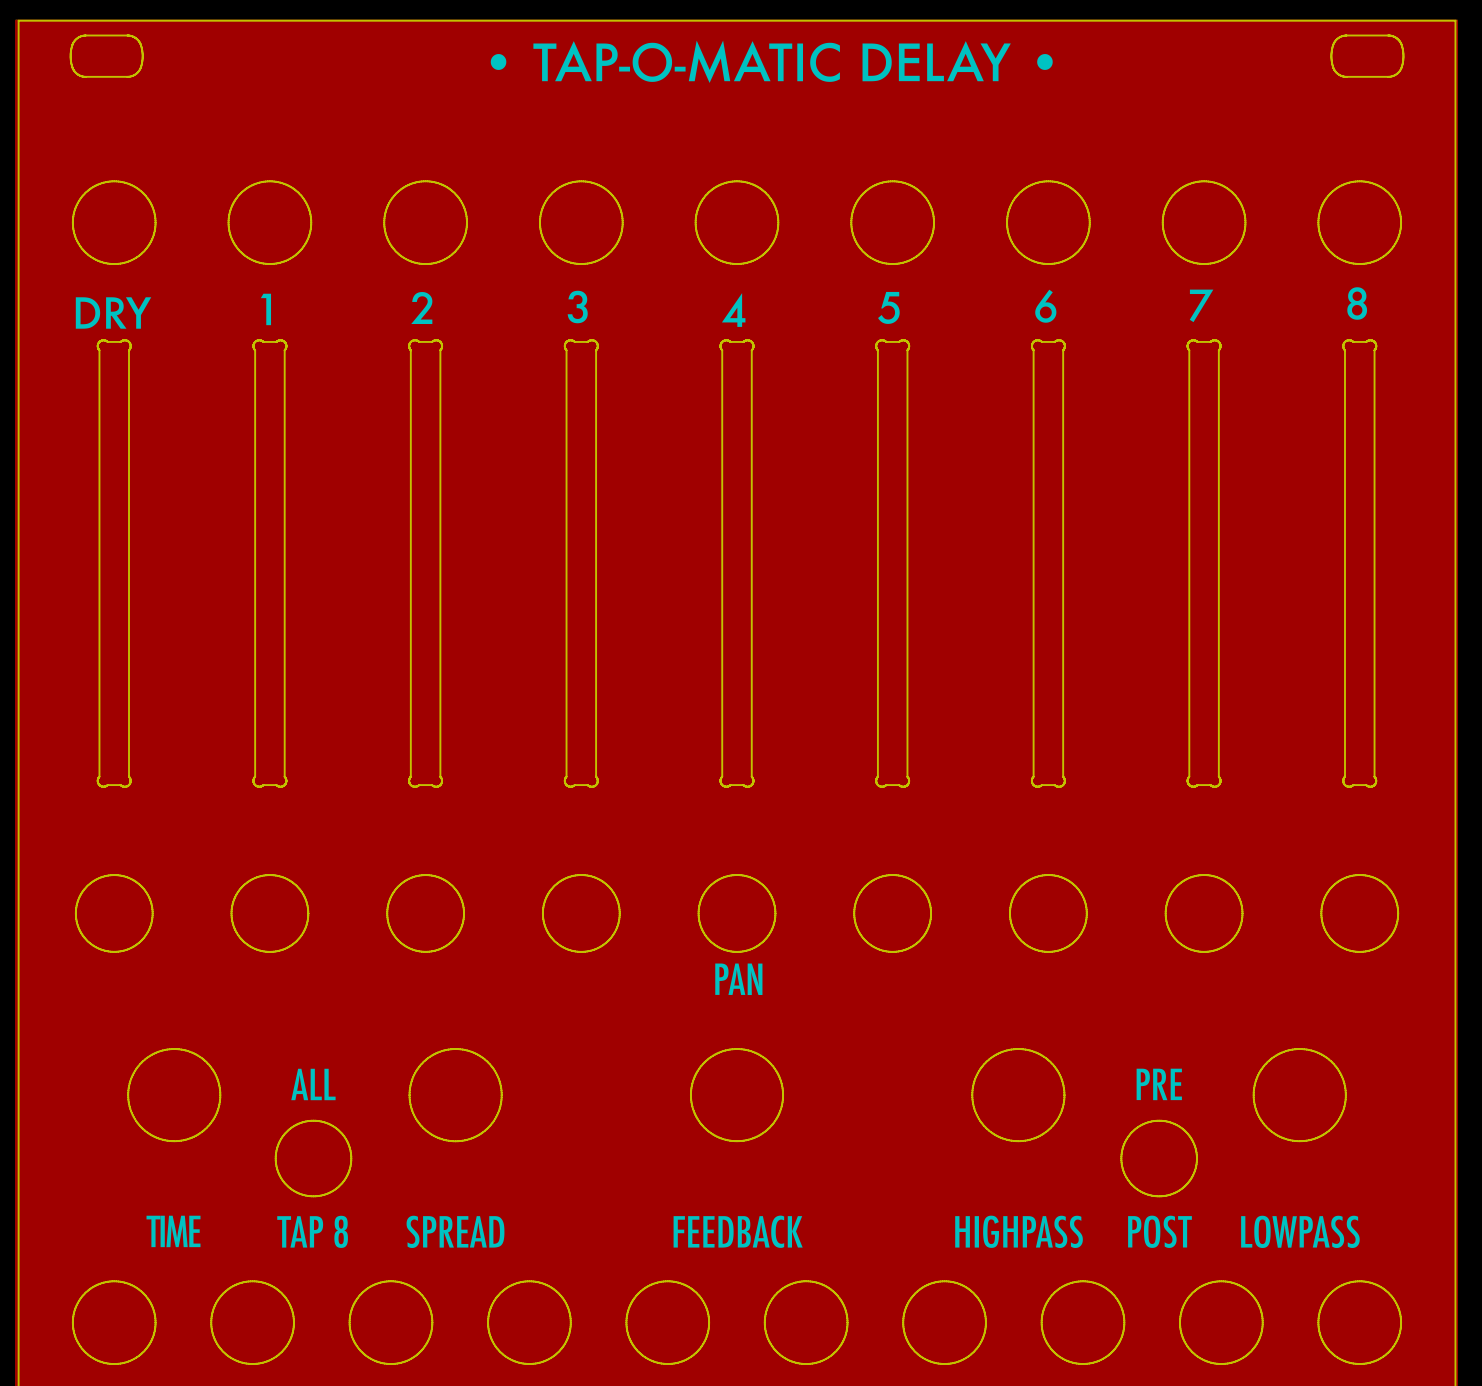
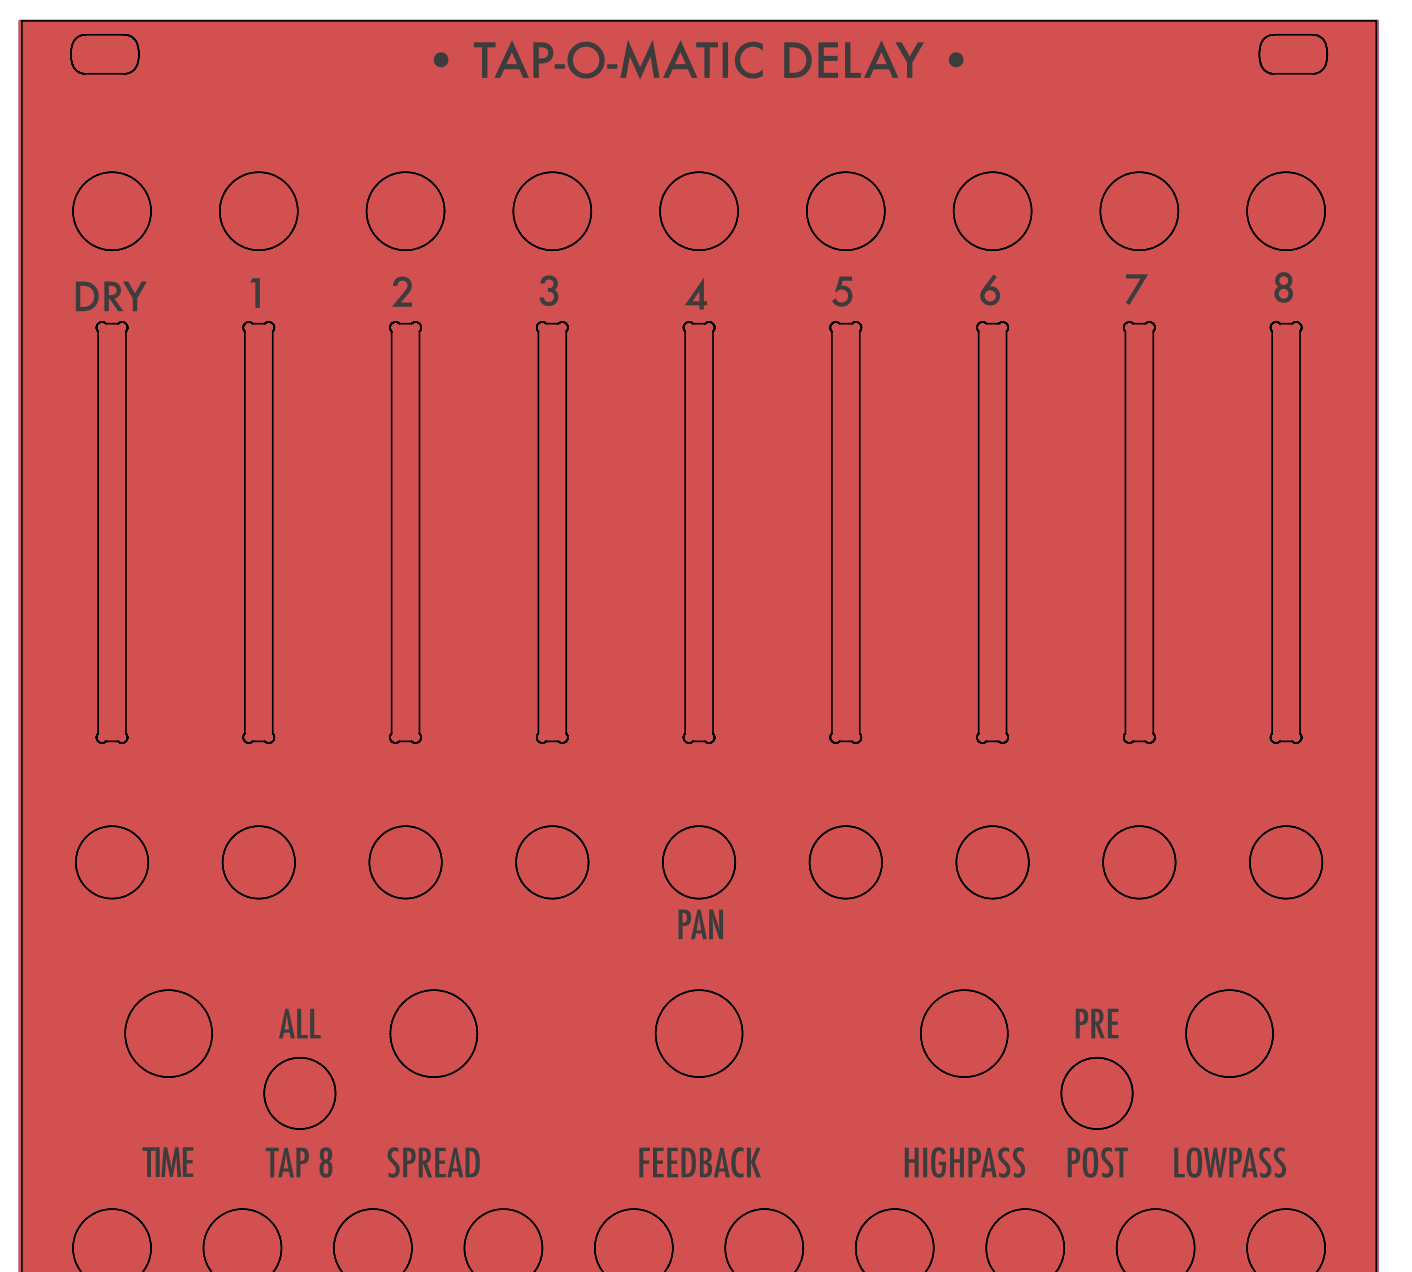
drawing position: (498, 61) -> (441, 59)
drawing position: (573, 61) -> (511, 59)
drawing position: (709, 61) -> (639, 59)
drawing position: (752, 61) -> (680, 59)
drawing position: (965, 61) -> (881, 59)
drawing position: (1044, 61) -> (956, 59)
drawing position: (544, 62) -> (484, 60)
drawing position: (607, 62) -> (543, 60)
drawing position: (652, 62) -> (586, 60)
drawing position: (780, 62) -> (707, 60)
drawing position: (800, 62) -> (725, 60)
drawing position: (825, 62) -> (748, 60)
drawing position: (877, 62) -> (797, 60)
drawing position: (909, 62) -> (828, 60)
drawing position: (935, 62) -> (852, 60)
drawing position: (995, 62) -> (909, 60)
drawing: none -> [554, 64, 565, 69]
drawing: [619, 66, 631, 72] -> none
drawing: none -> [607, 64, 618, 69]
drawing: [674, 66, 686, 72] -> none

